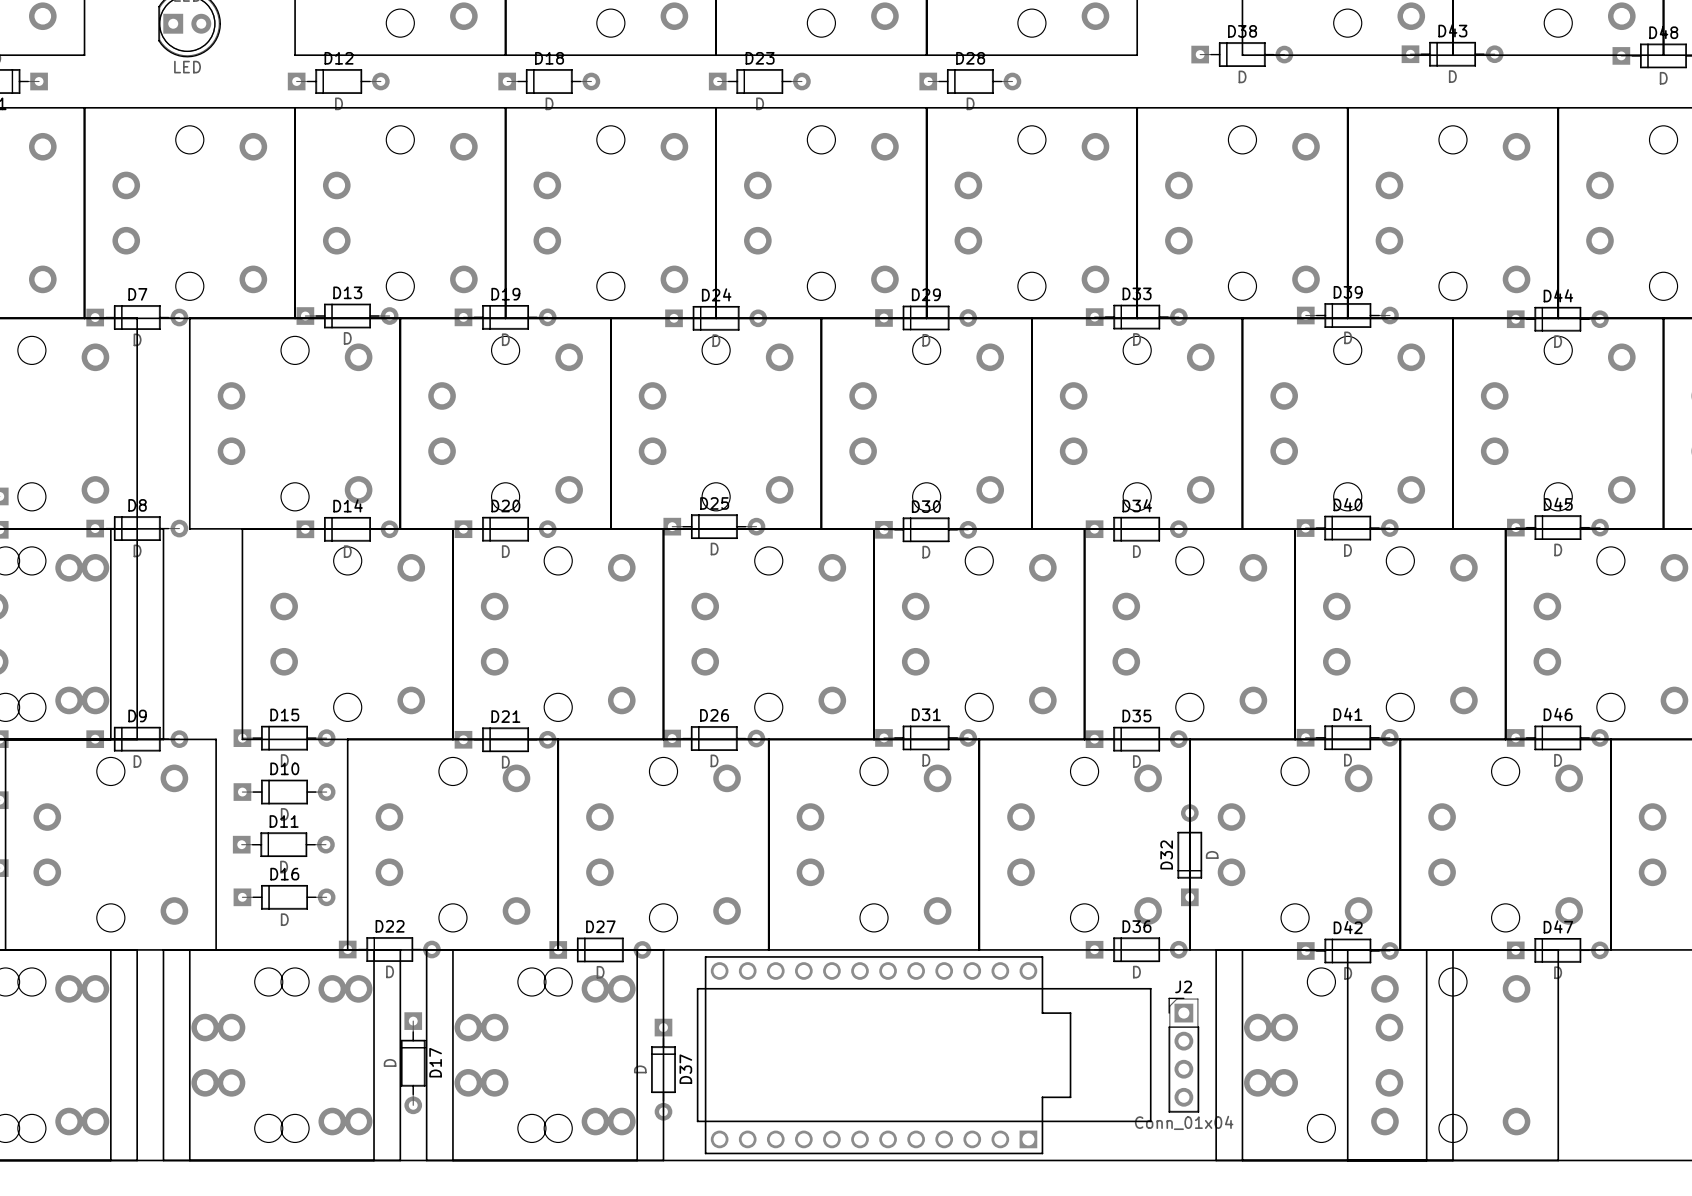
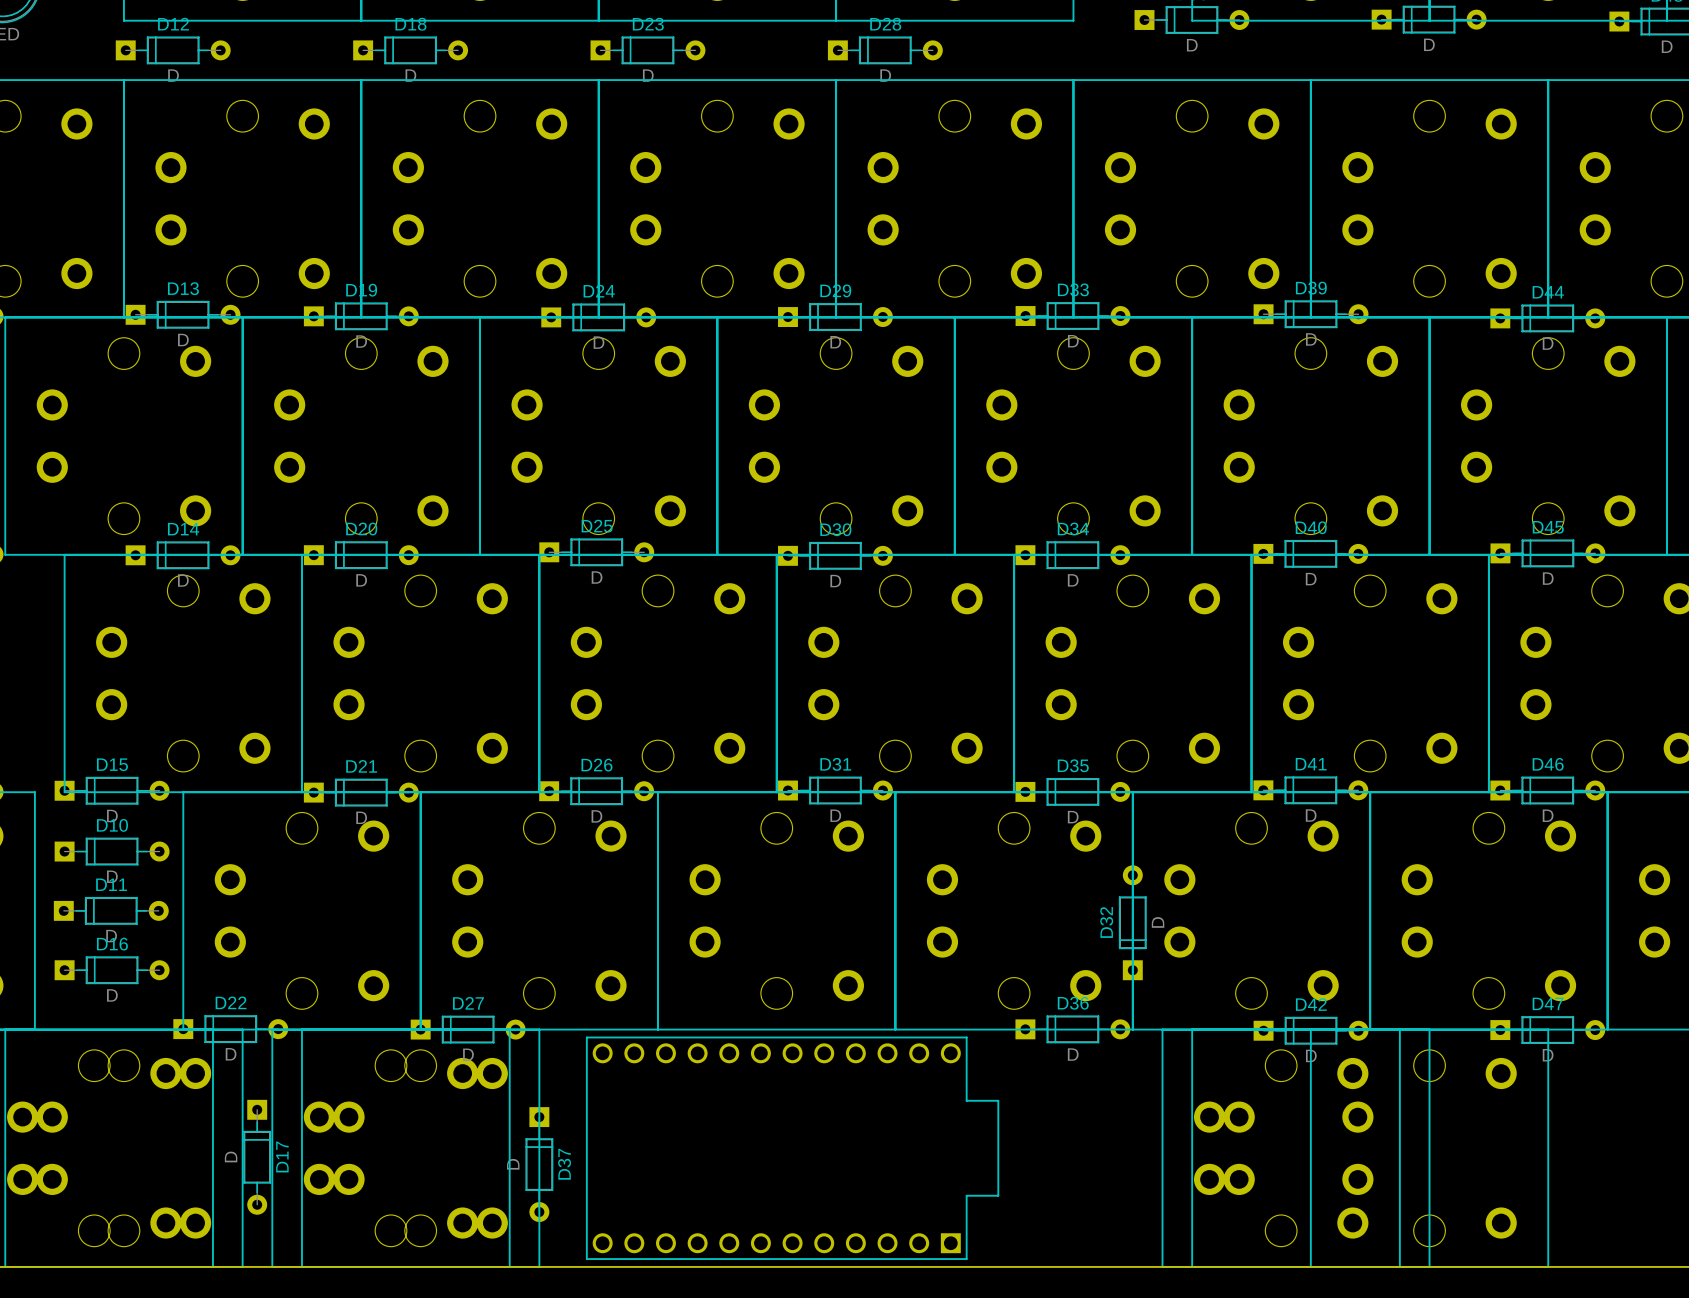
board edge: (697, 988) (1150, 988) (1150, 1121) (697, 1121) (697, 988) -> none
J2: Conn_01x04 (1183, 1055) -> none

